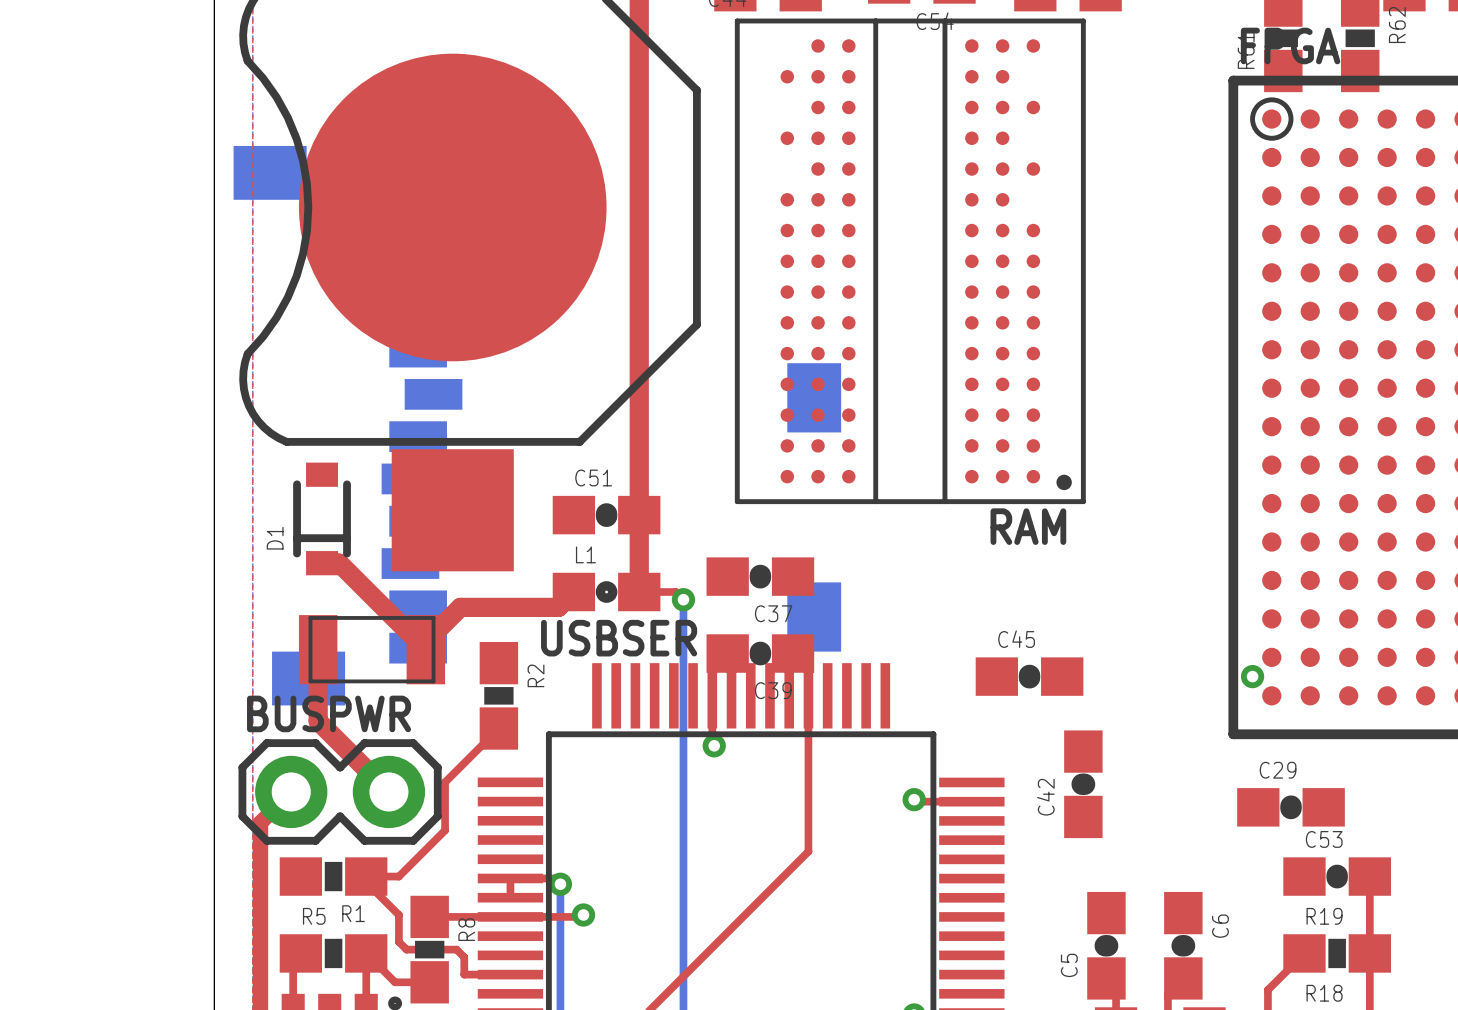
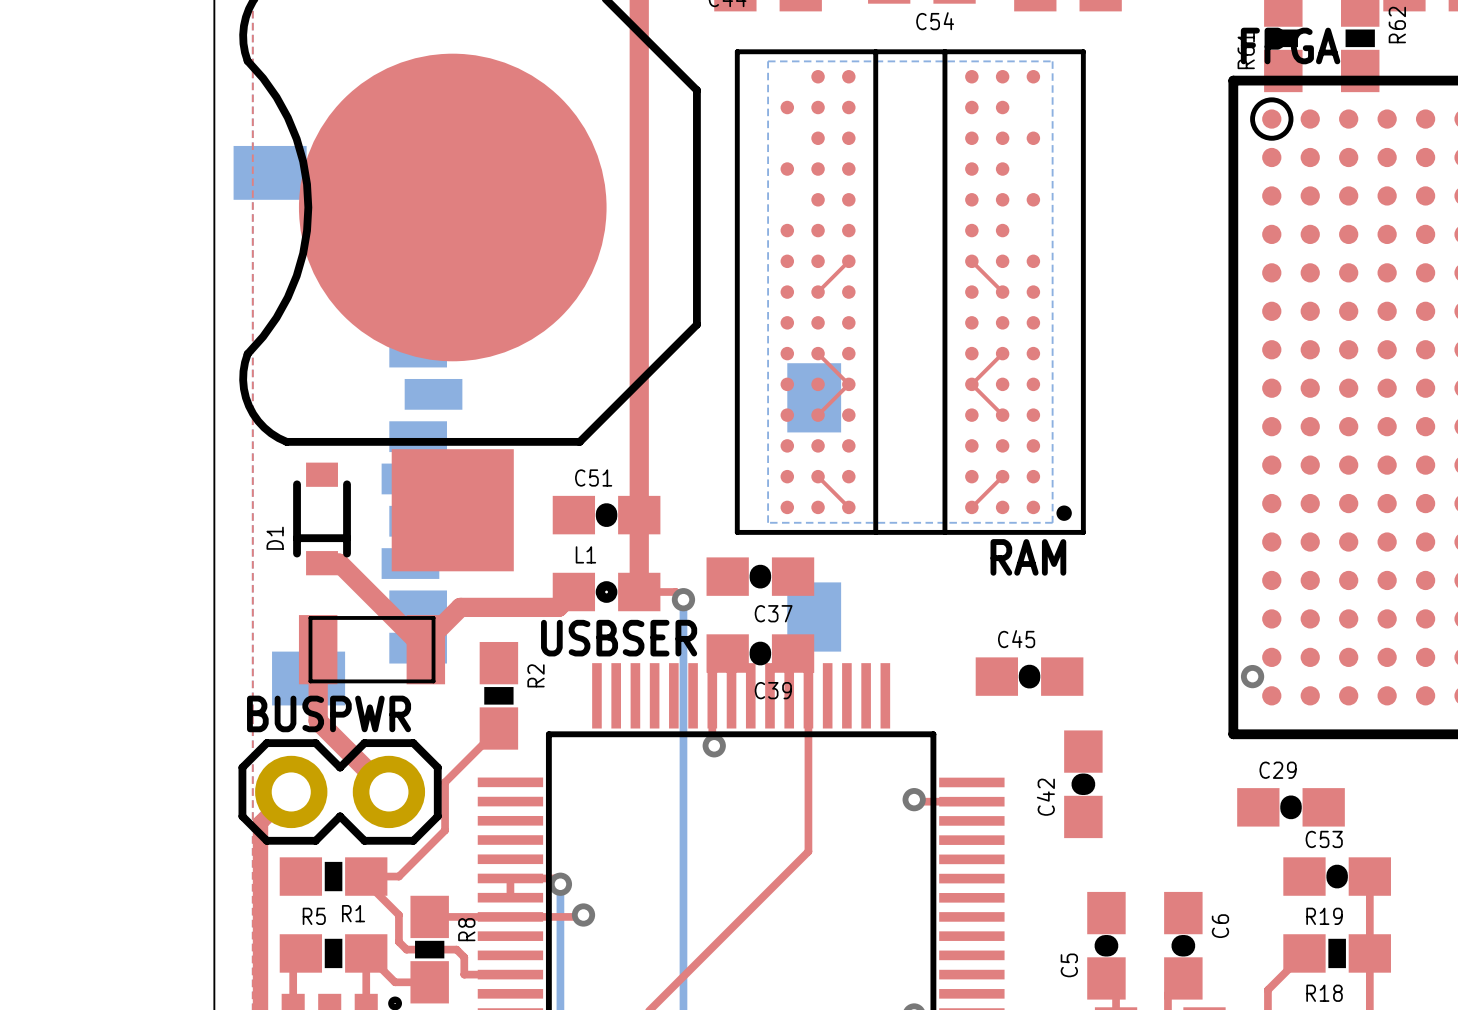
bottom zone outline: none -> (768, 61) (1052, 61) (1052, 522) (768, 522) (768, 61)
top track: none -> (848, 261) (818, 292)
RAM position: (910, 261) -> (910, 292)
top track: none -> (971, 261) (1002, 292)
top track: none -> (818, 353) (848, 384) (818, 415)
top track: none -> (1002, 353) (971, 384) (1002, 415)
top track: none -> (818, 476) (848, 507)
top track: none -> (1002, 476) (971, 507)

